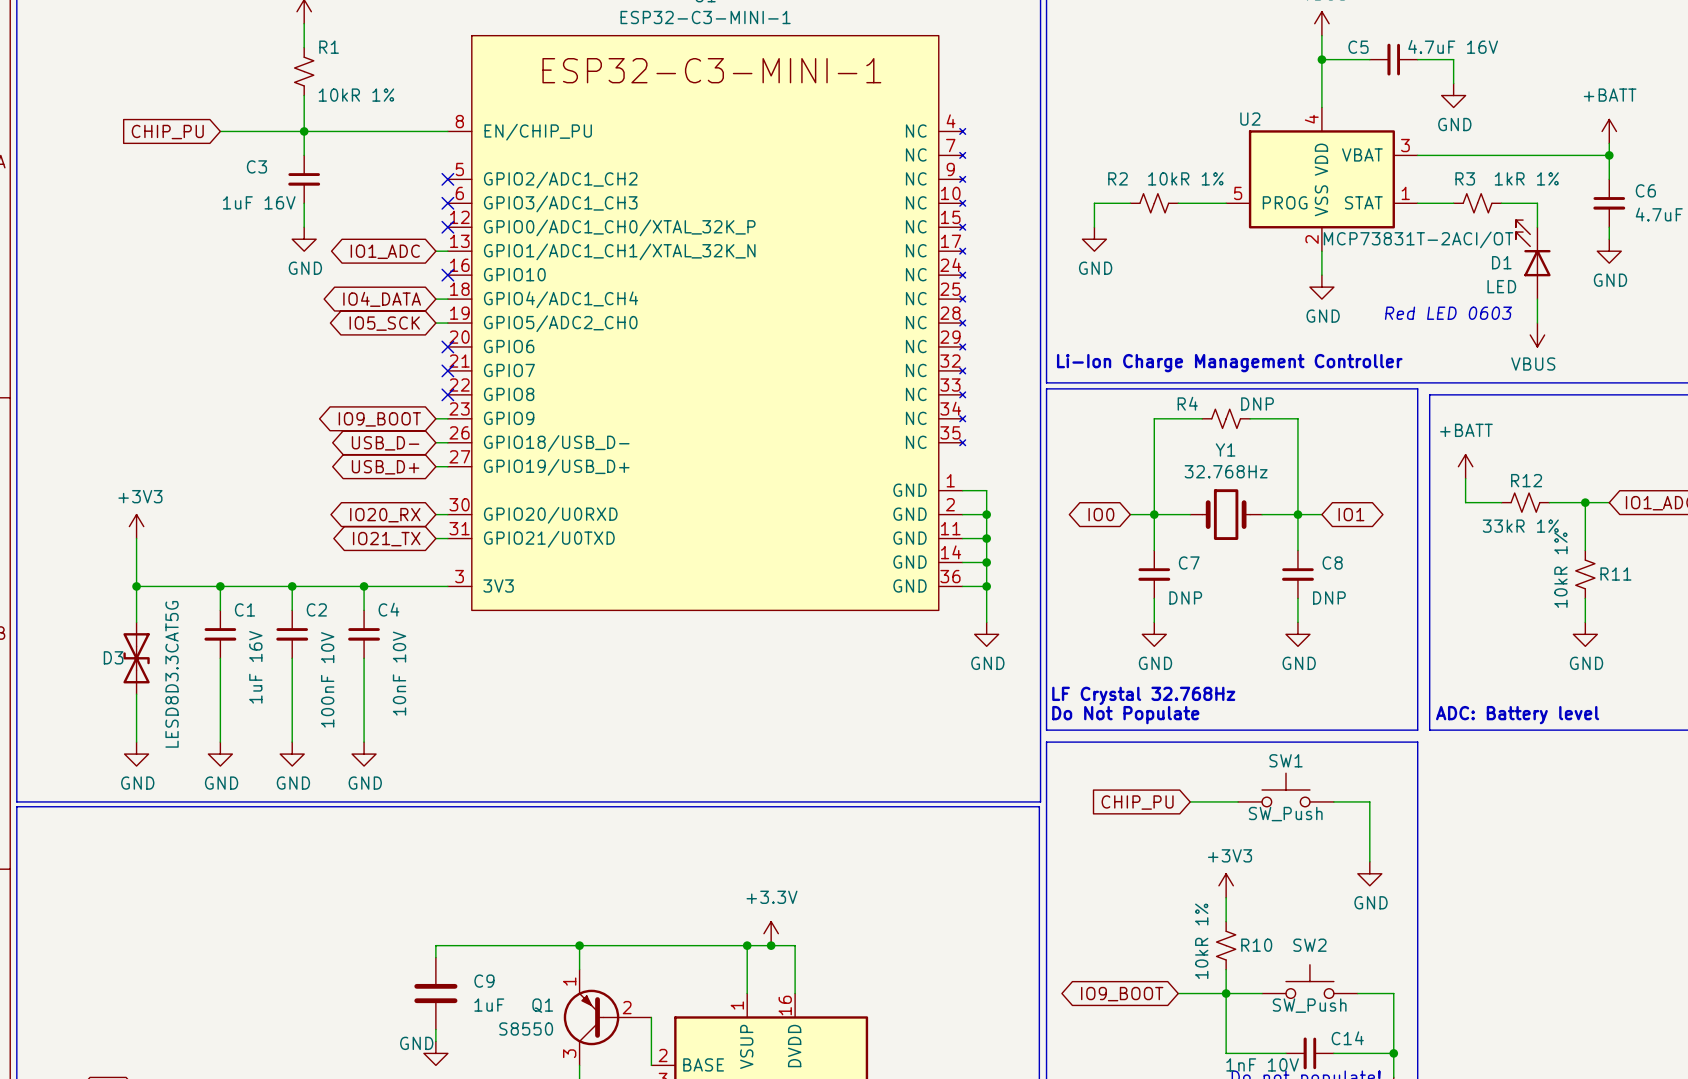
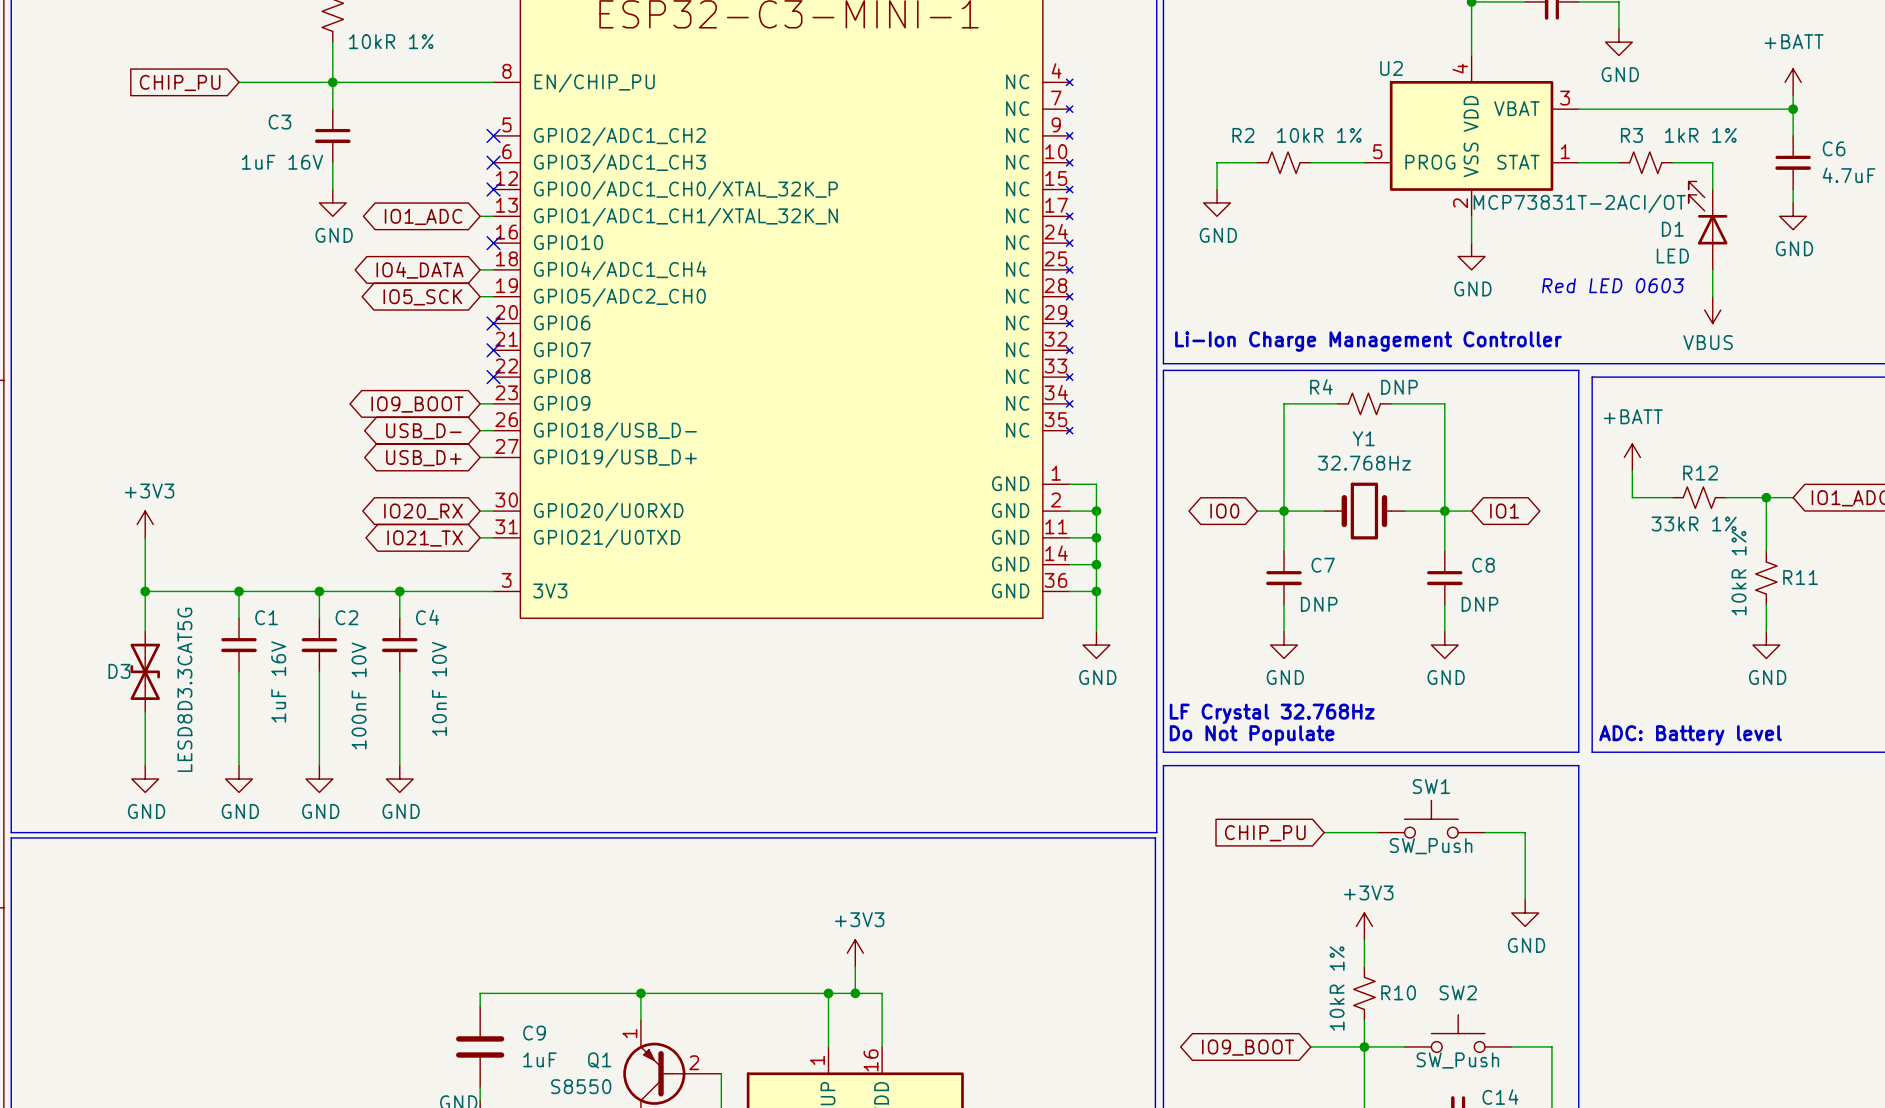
power symbol: none -> +3V3 (855, 953)
power symbol: +3.3V (771, 933) -> none

